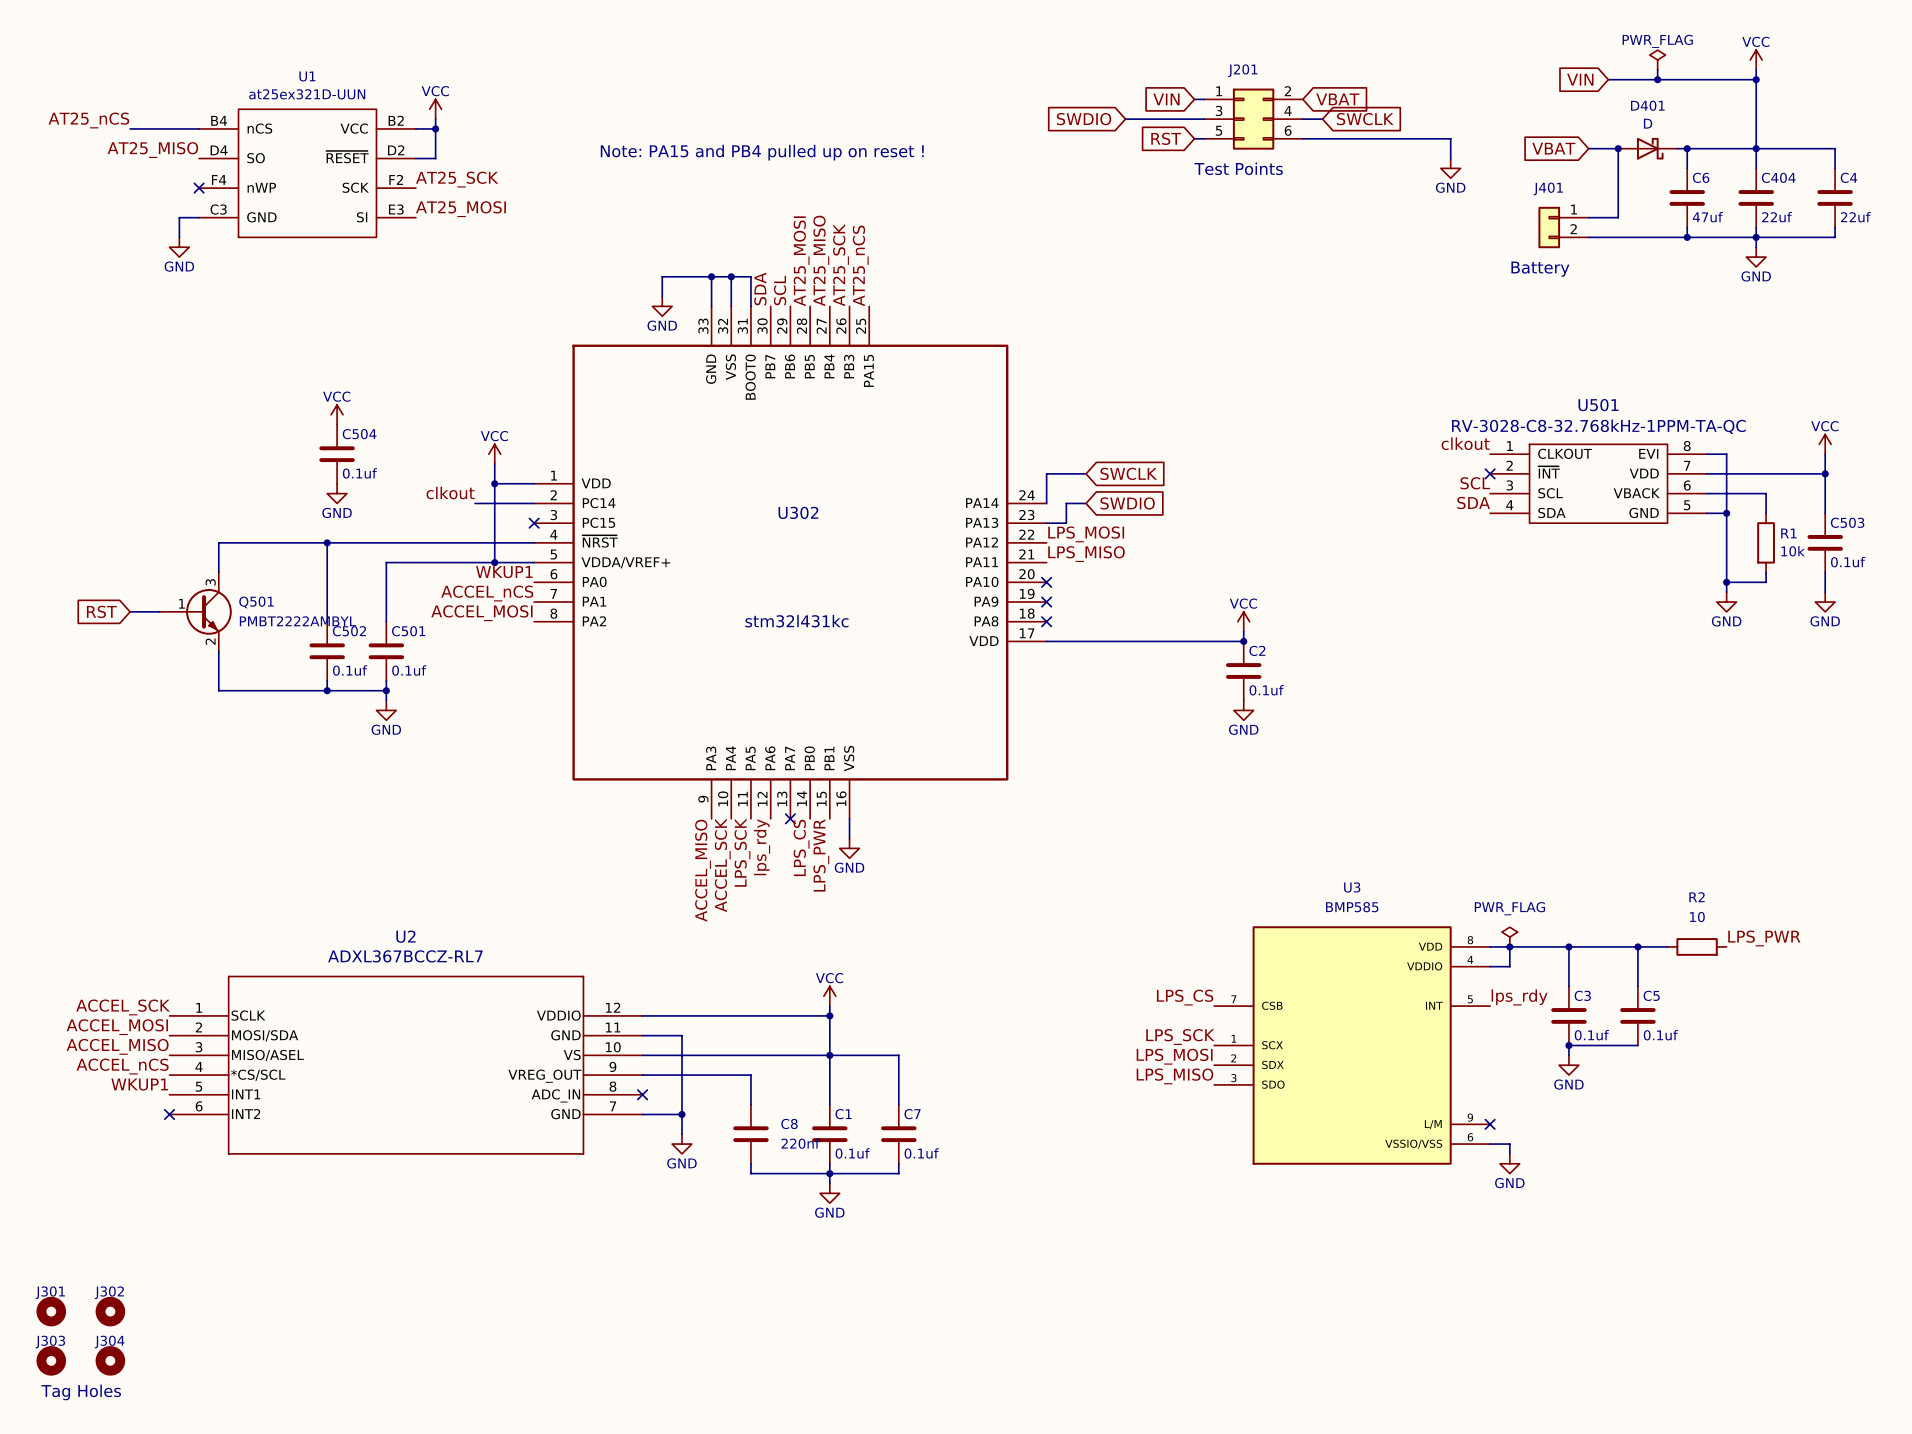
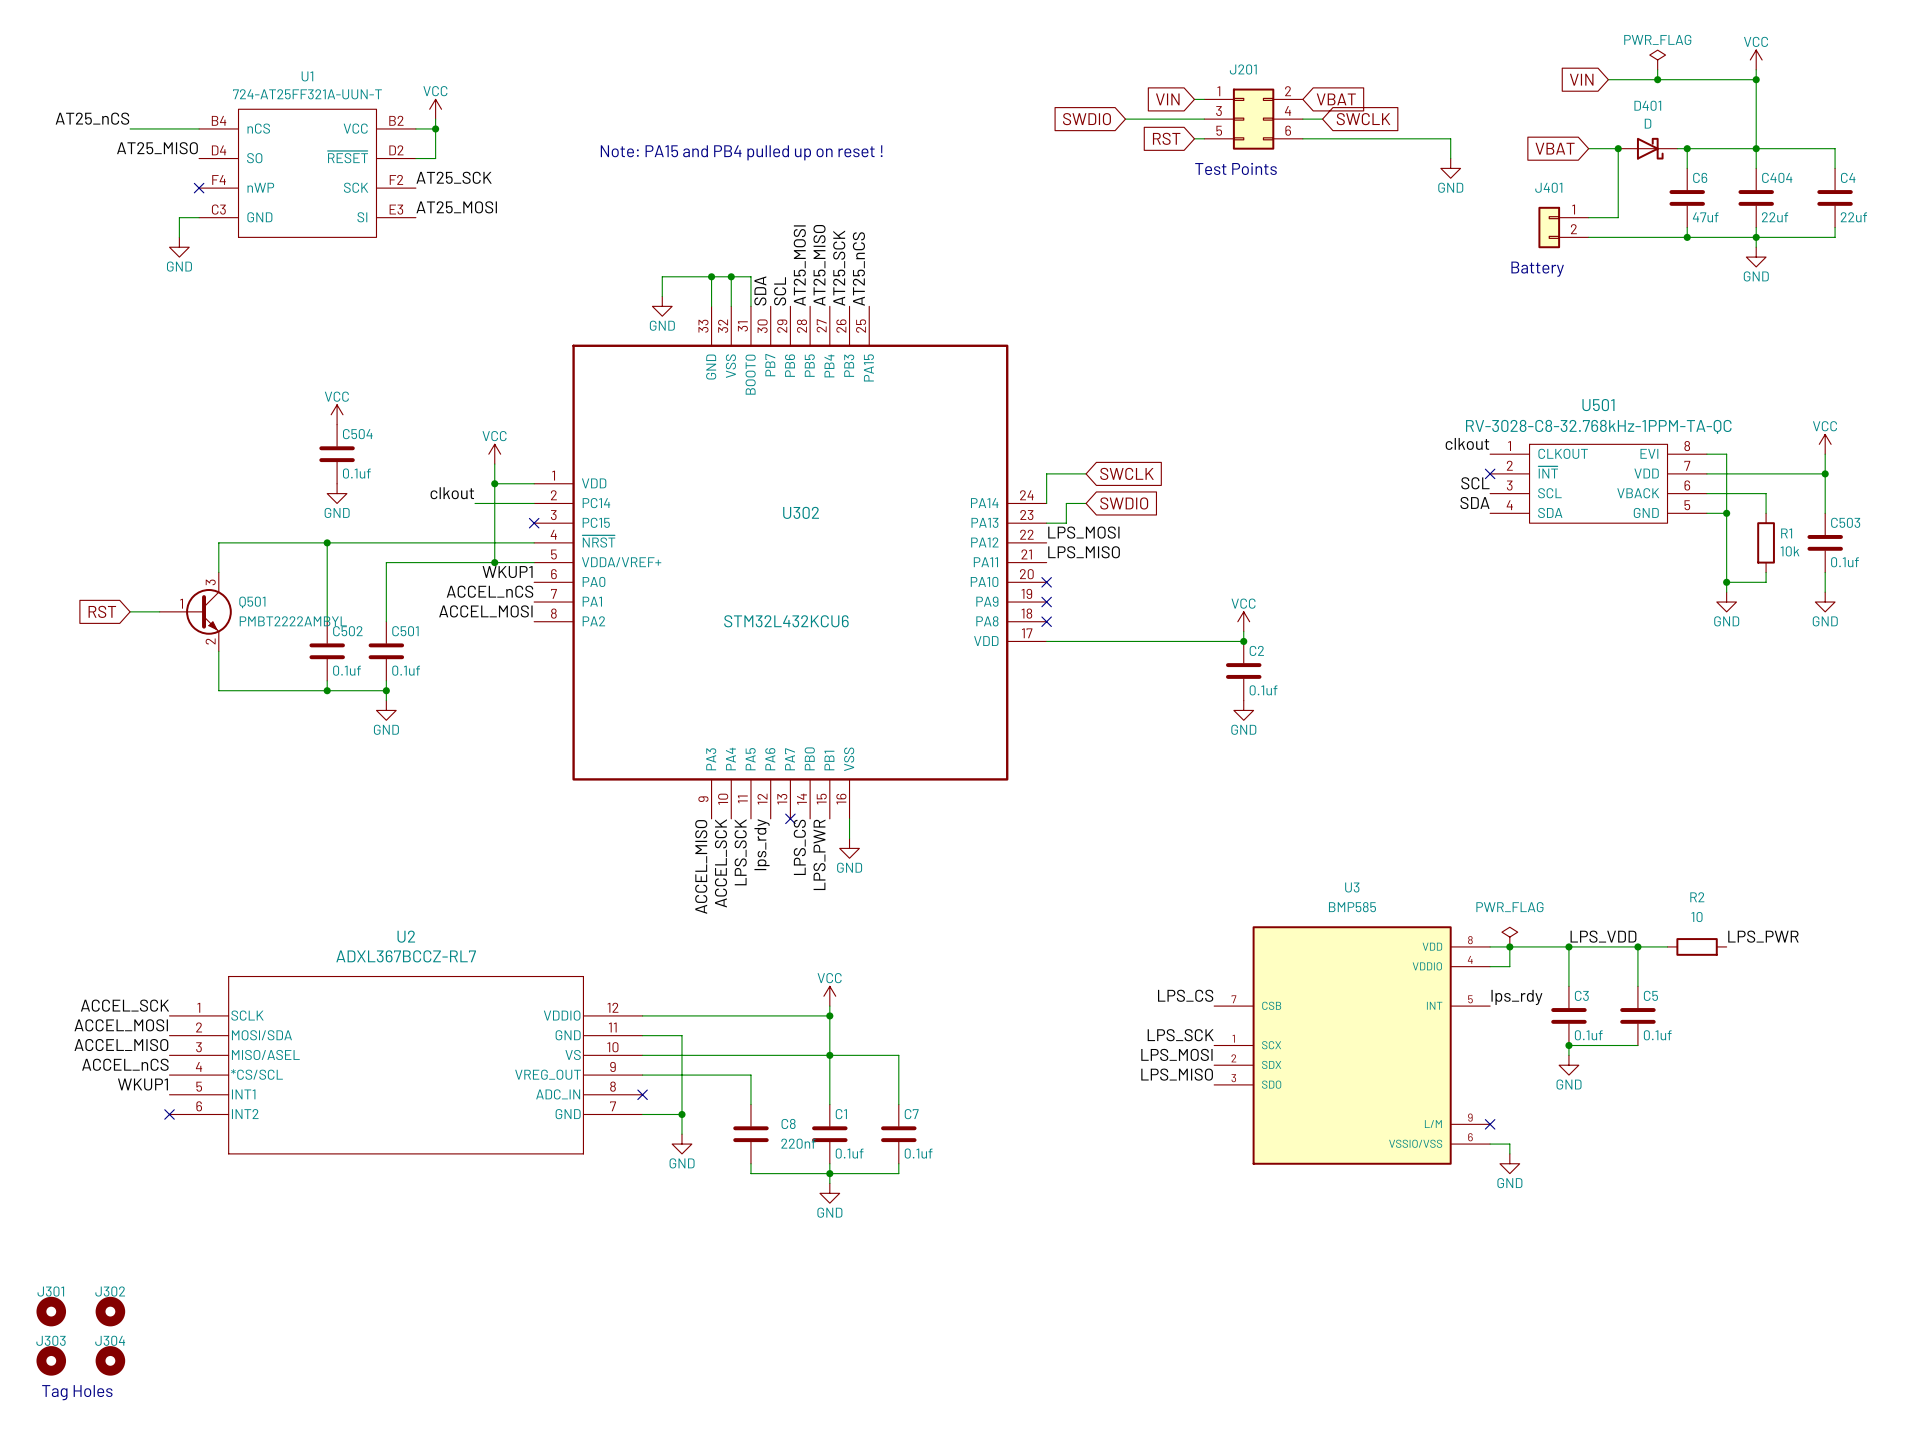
U1 value: at25ex321D-UUN (307, 94) -> 724-AT25FF321A-UUN-T (307, 94)
U302 value: stm32l431kc (796, 621) -> STM32L432KCU6 (786, 621)
label: none -> LPS_VDD (1603, 936)

